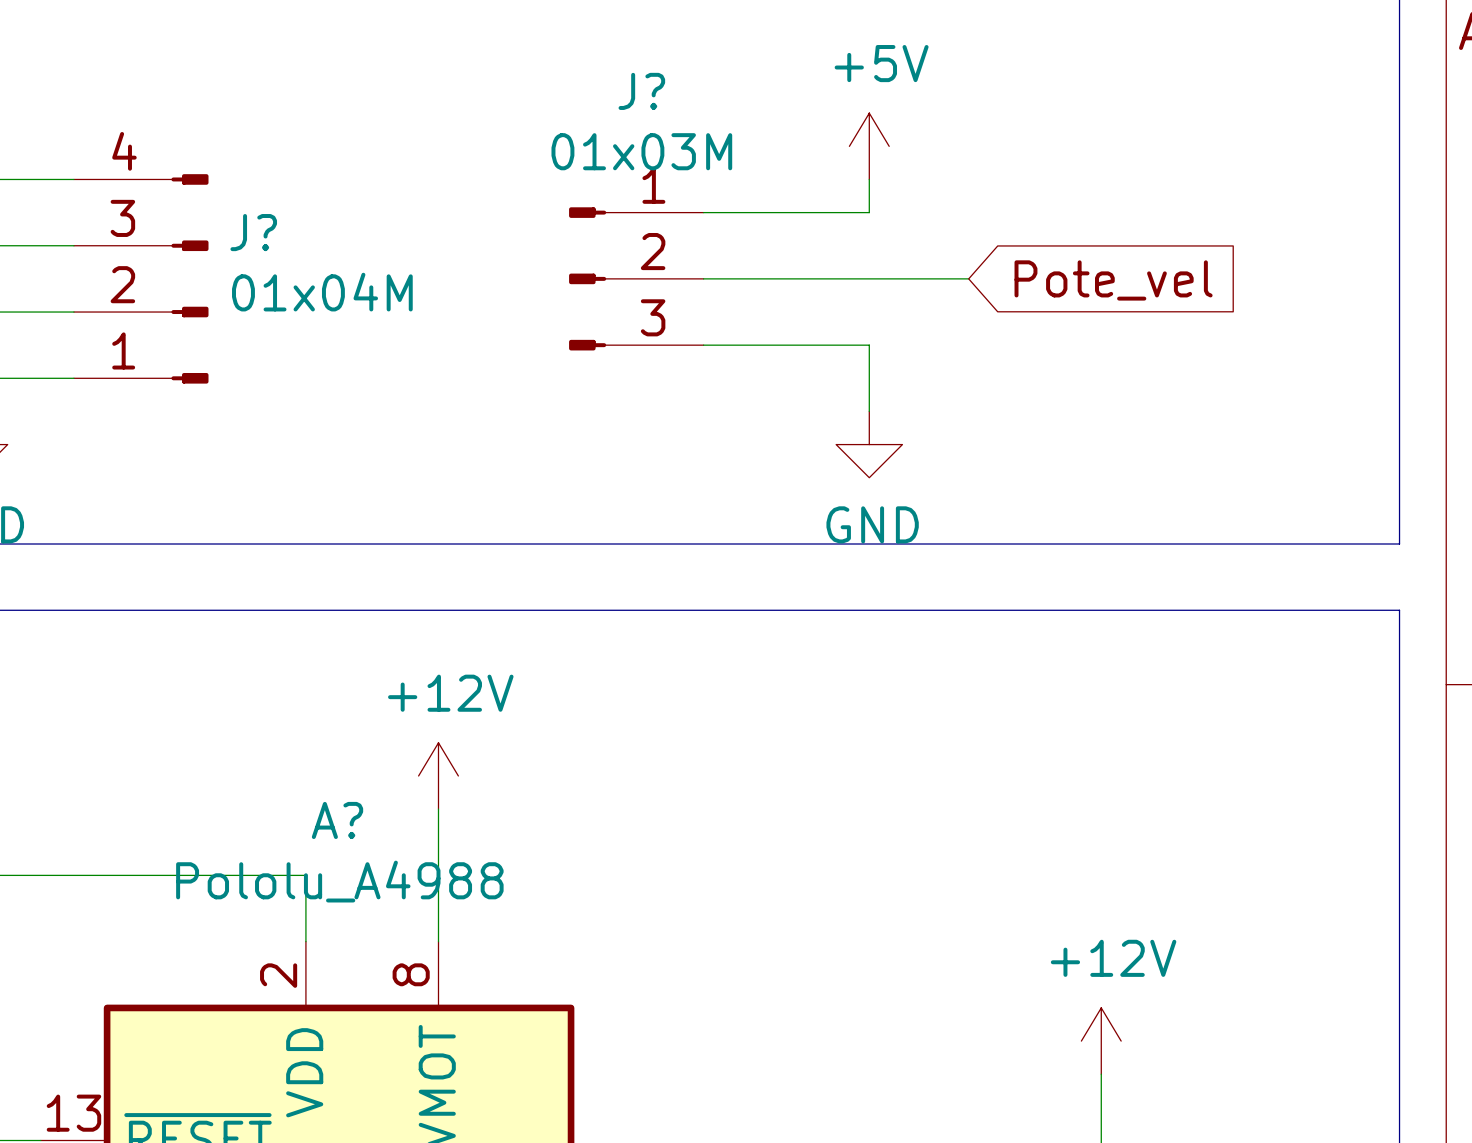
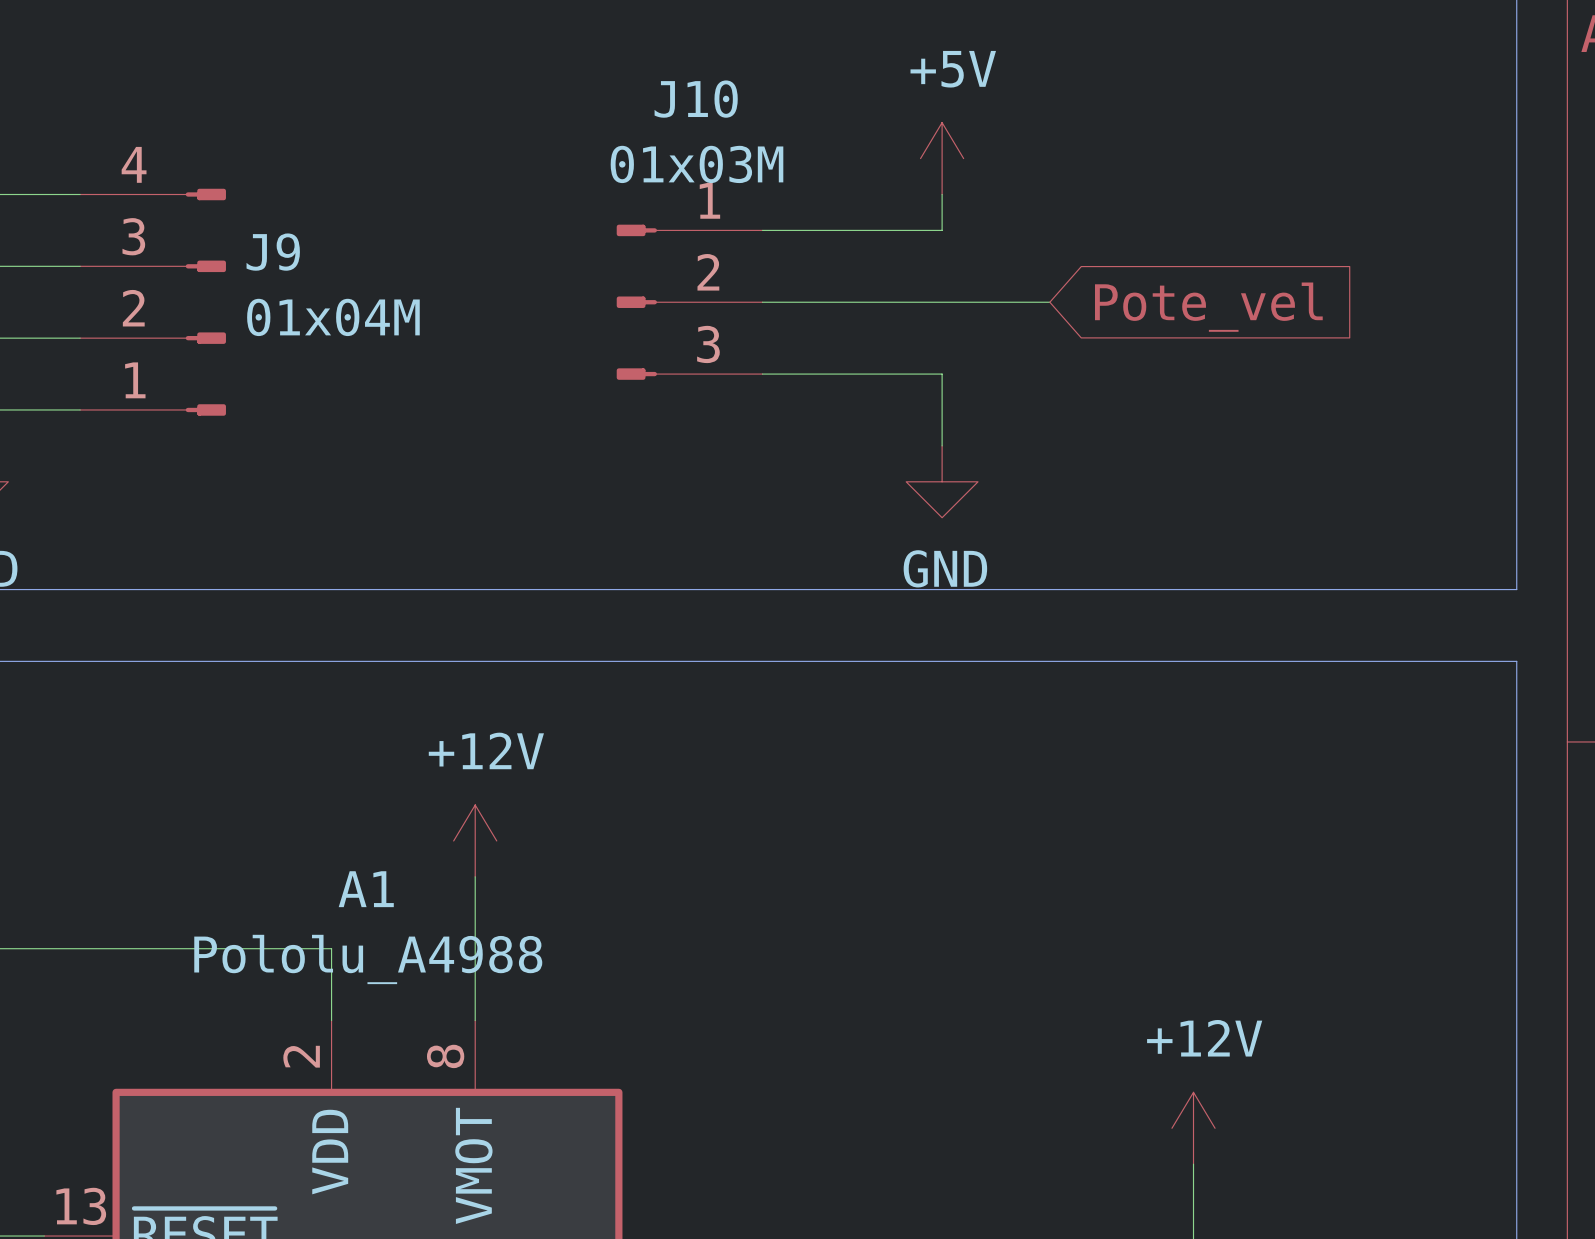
J? name: J? (641, 91) -> J10 (696, 99)
J? name: J? (253, 232) -> J9 (273, 252)
A? name: A? (337, 820) -> A1 (366, 889)

